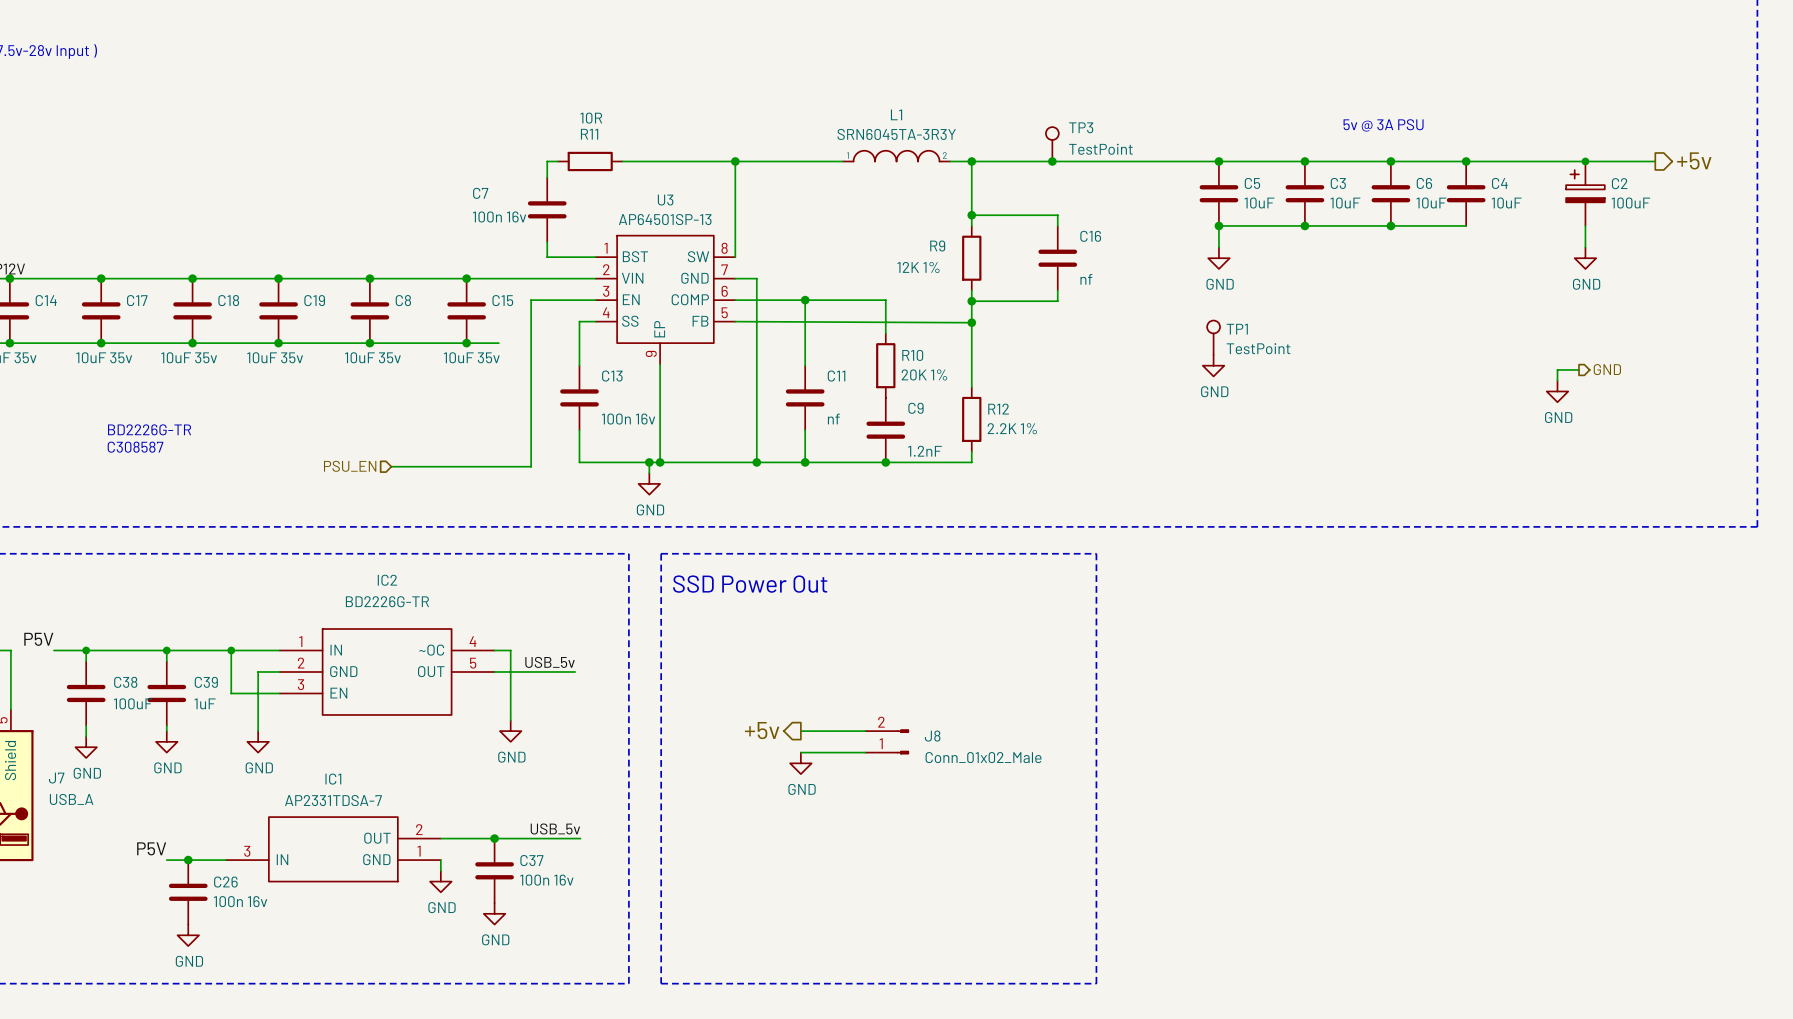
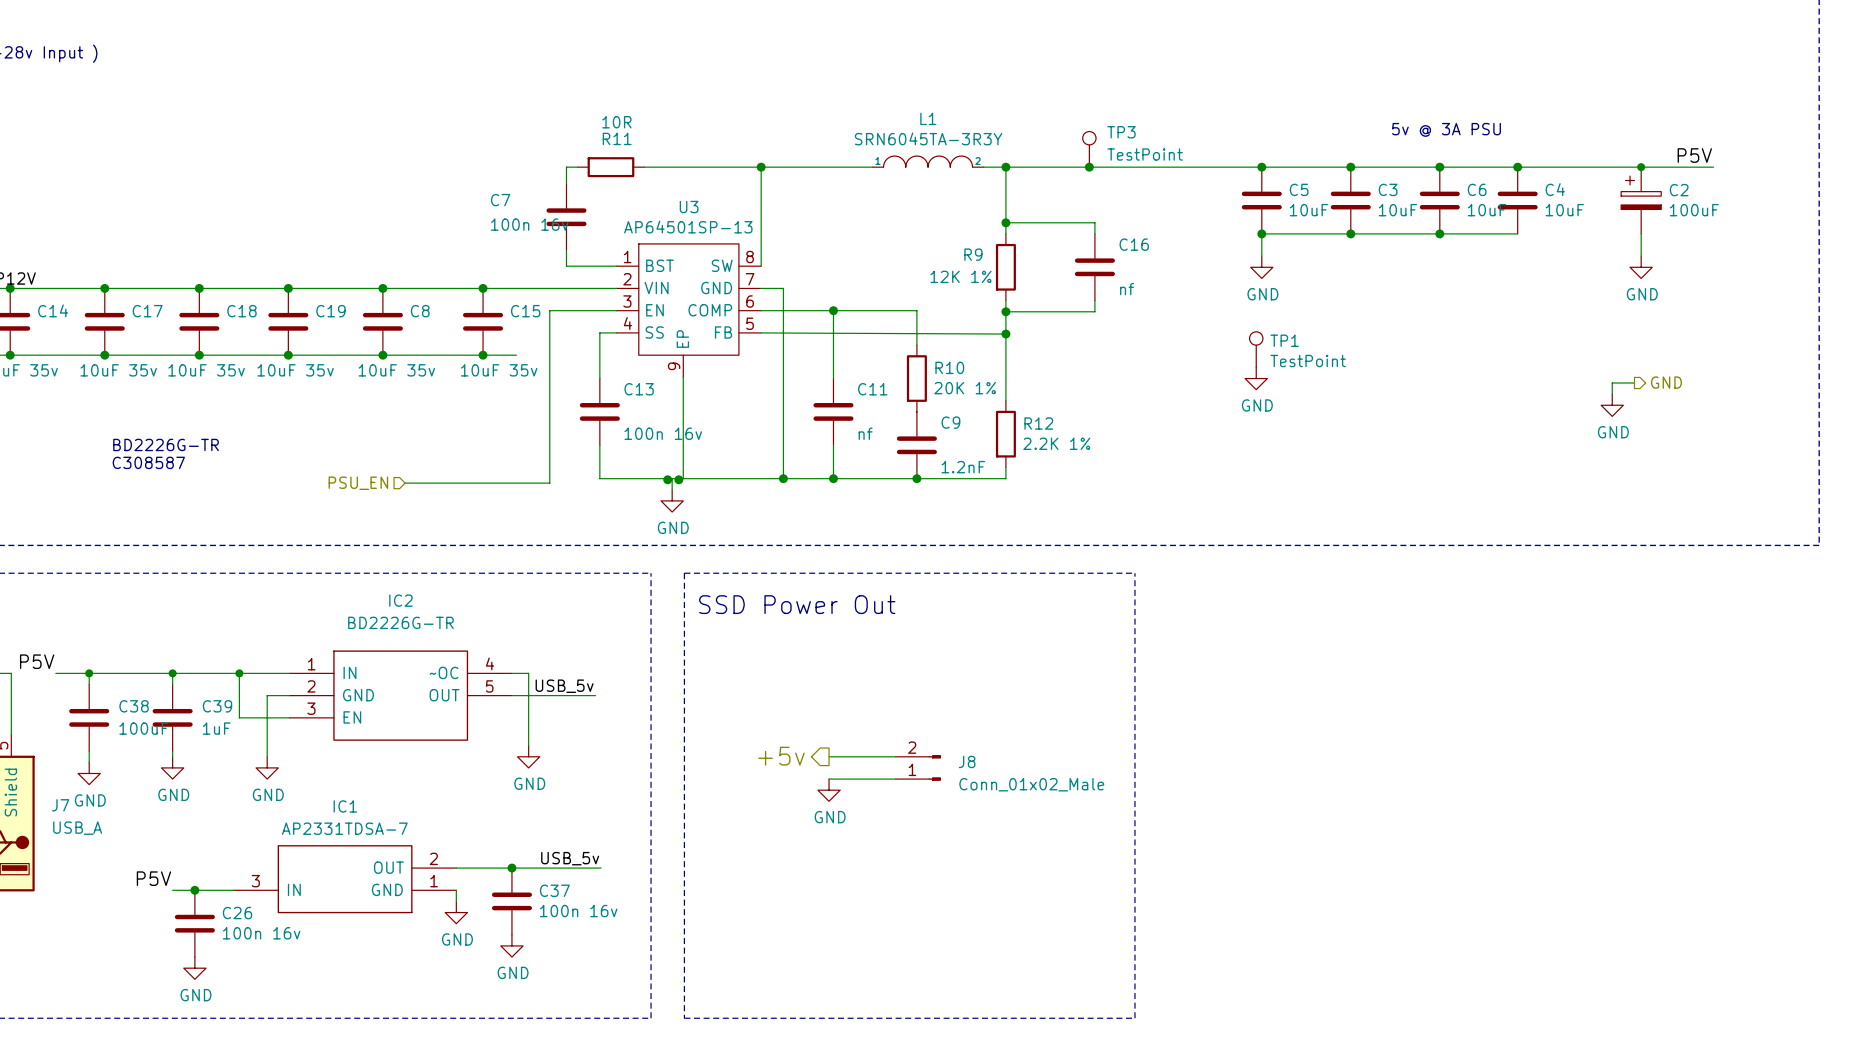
label: none -> P5V (1694, 155)
hierarchical label: +5v (1694, 160) -> none
junction: (649, 462) -> none
junction: (660, 462) -> none
junction: none -> (667, 479)
junction: none -> (678, 479)

